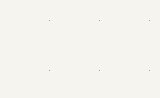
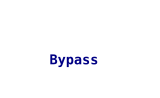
text: none -> Bypass (73, 60)

